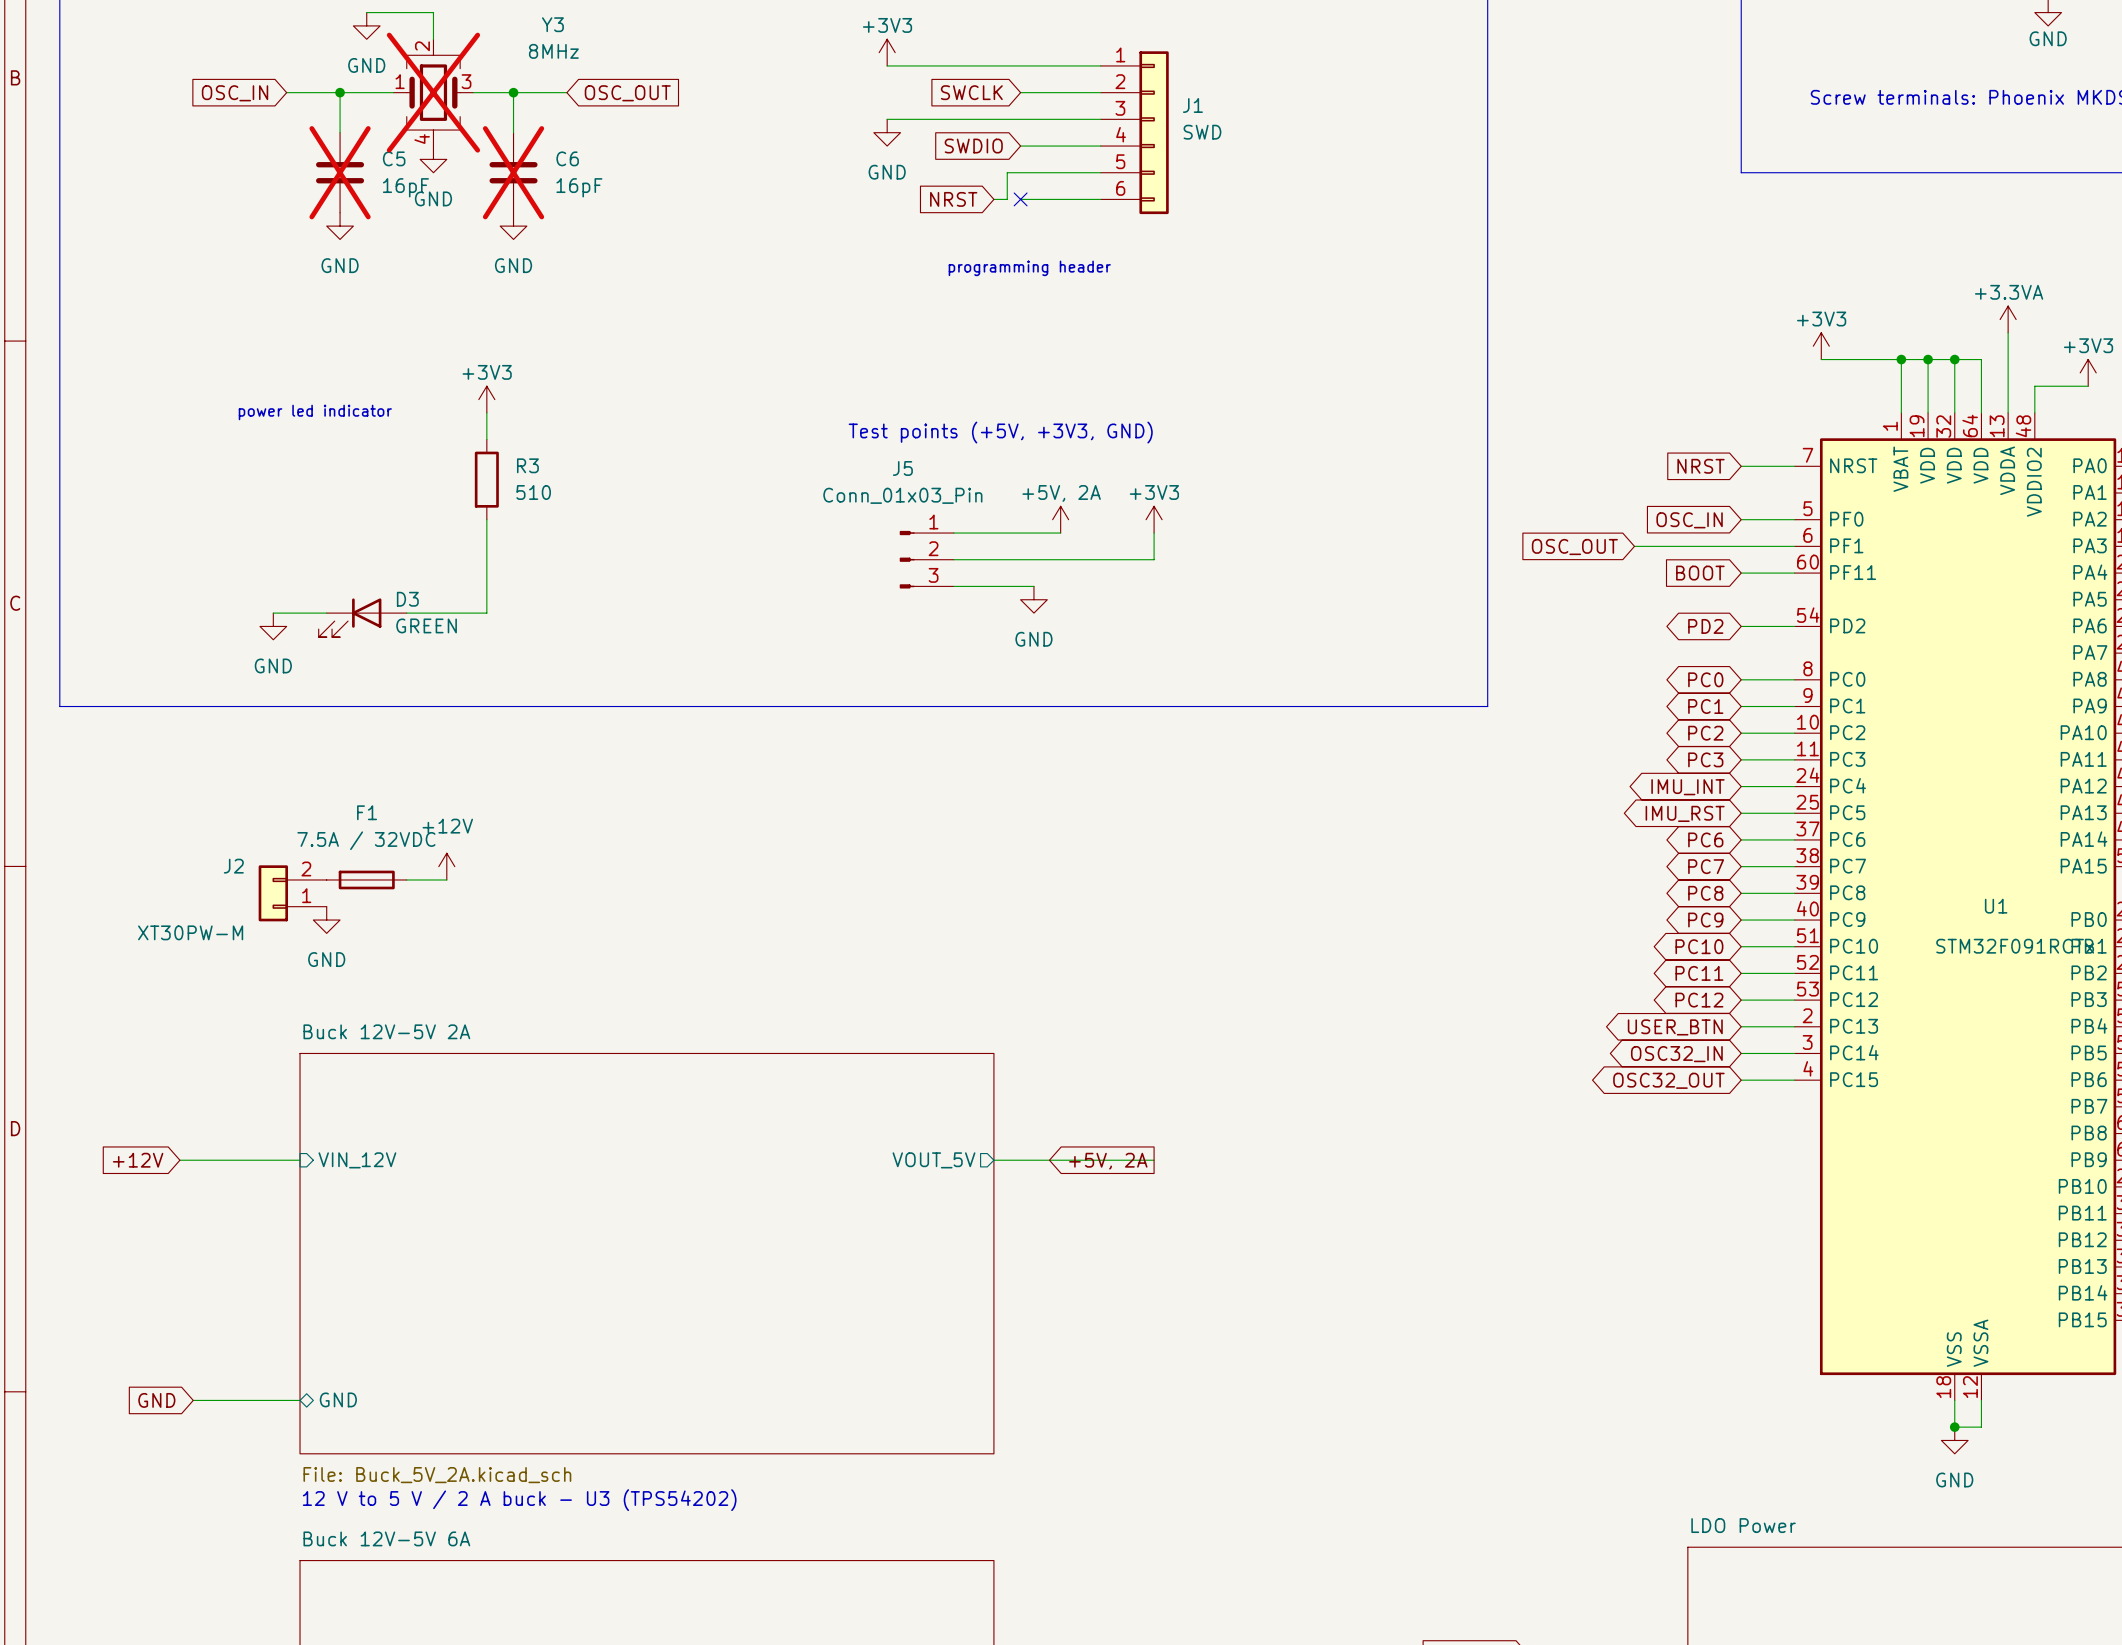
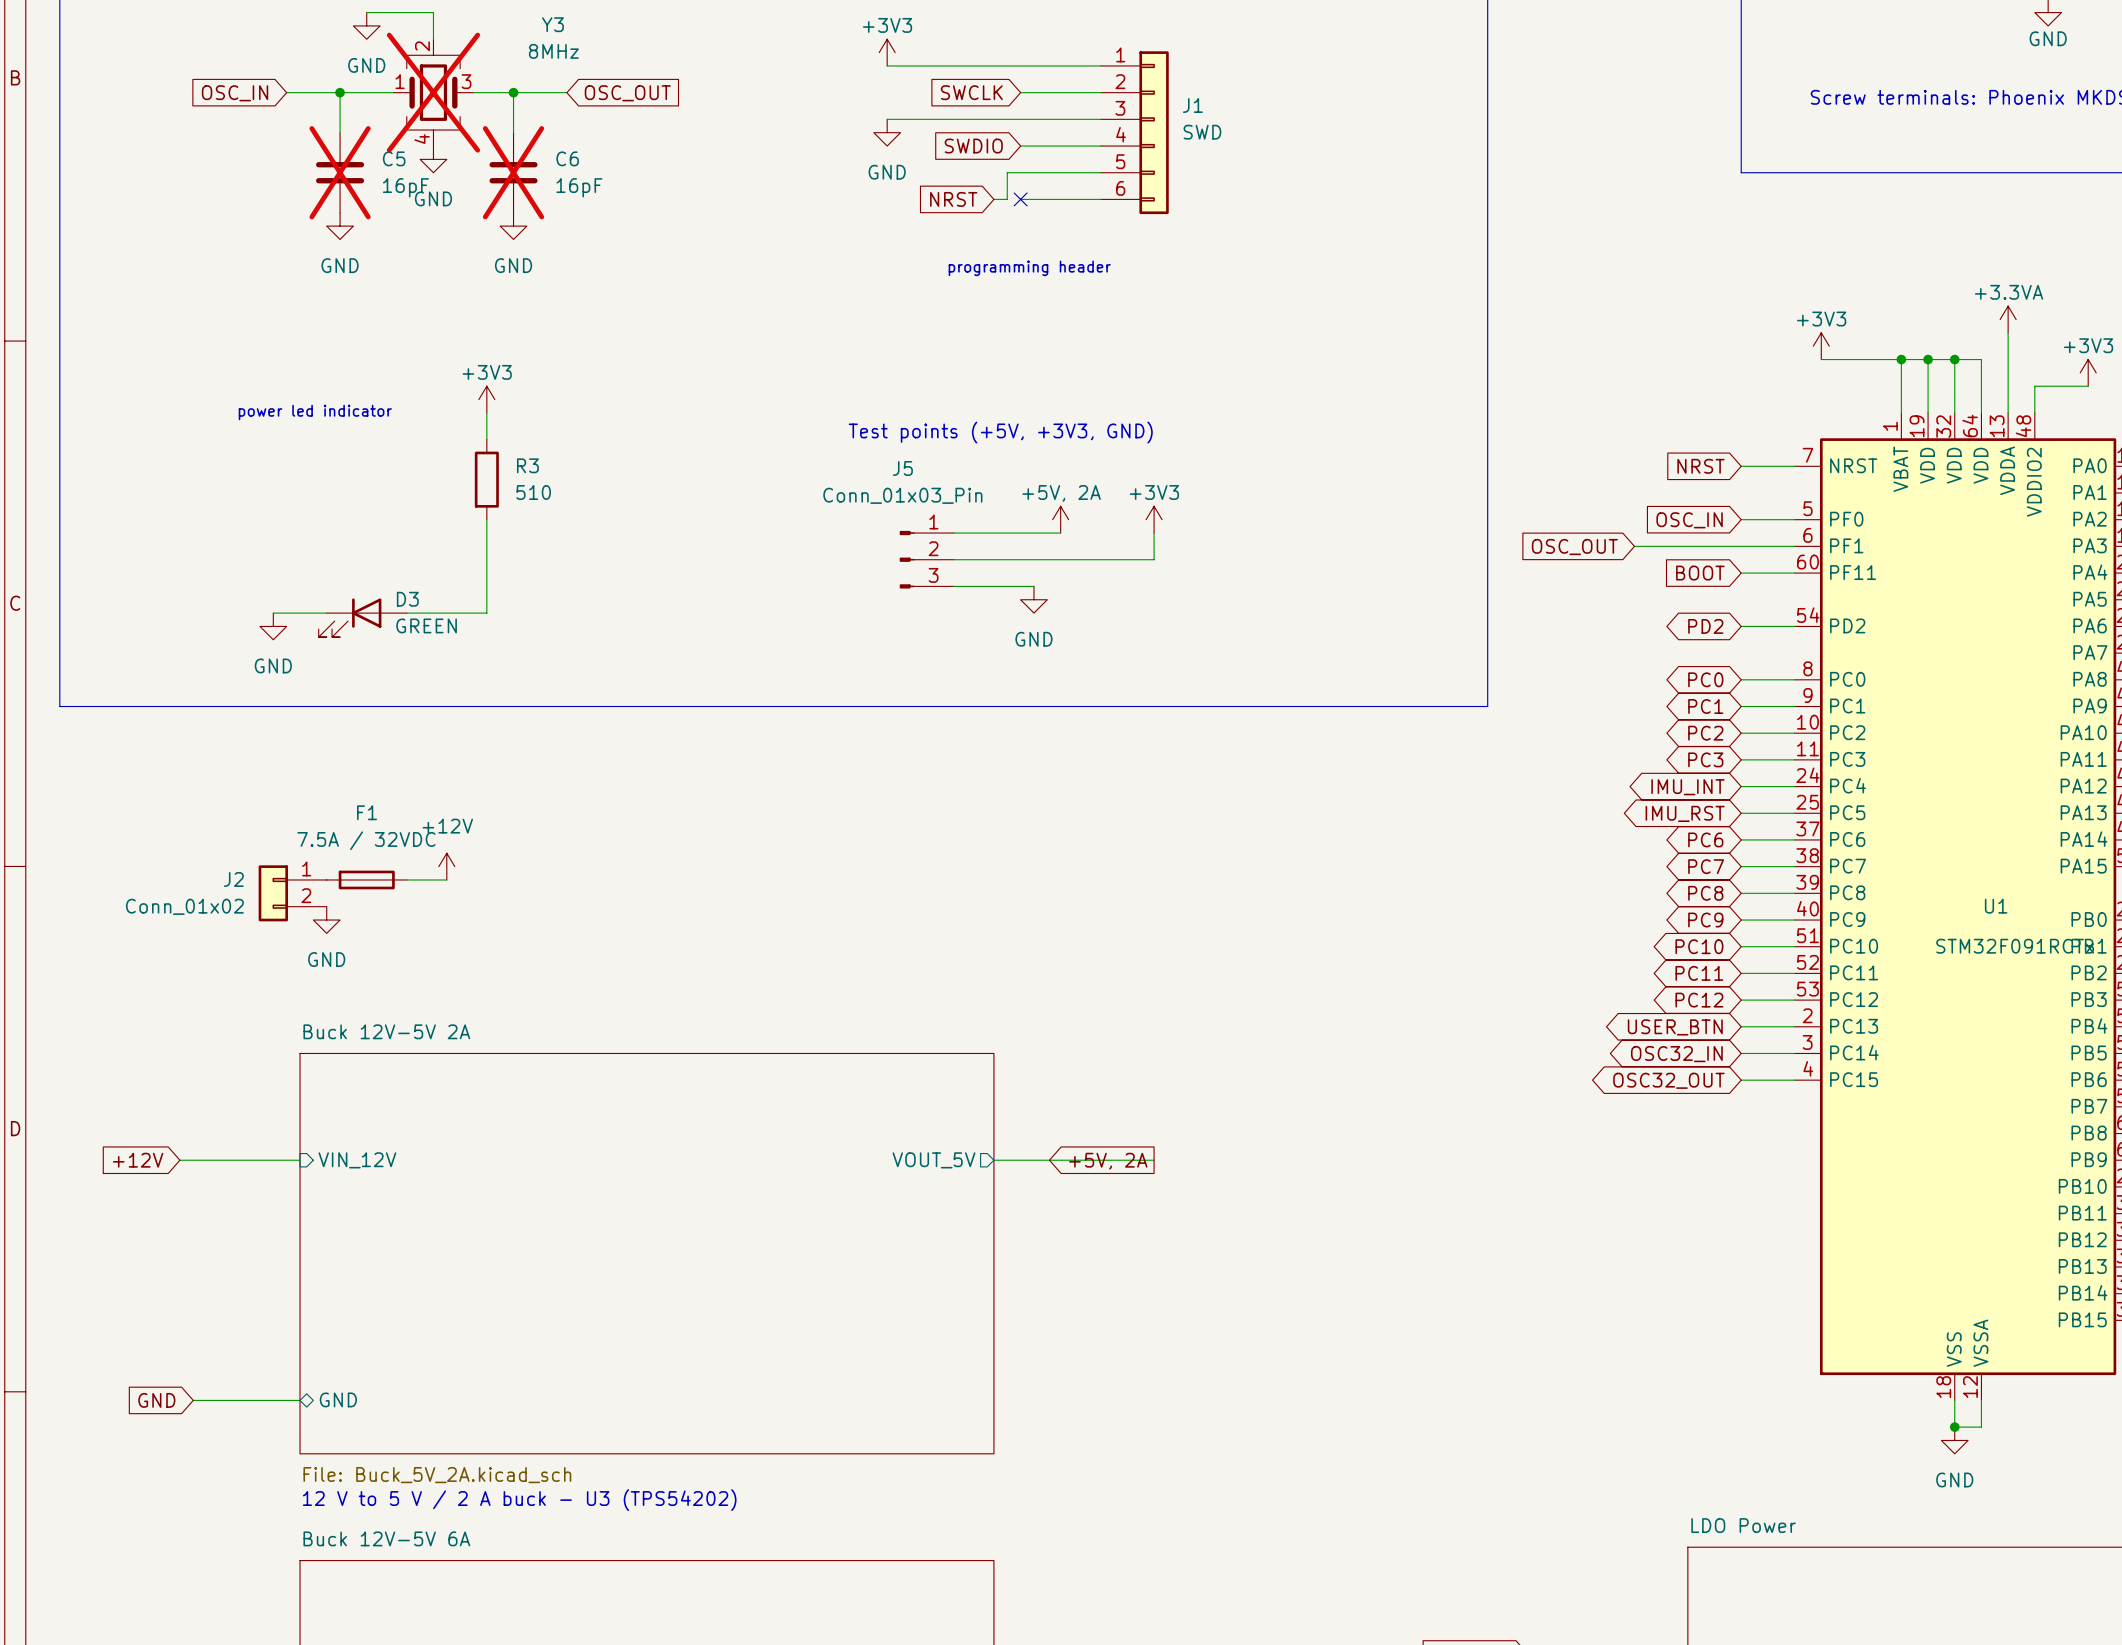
J2 flip: as is (273, 893) -> up-down (273, 893)
J2 value: XT30PW-M (190, 932) -> Conn_01x02 (184, 906)

